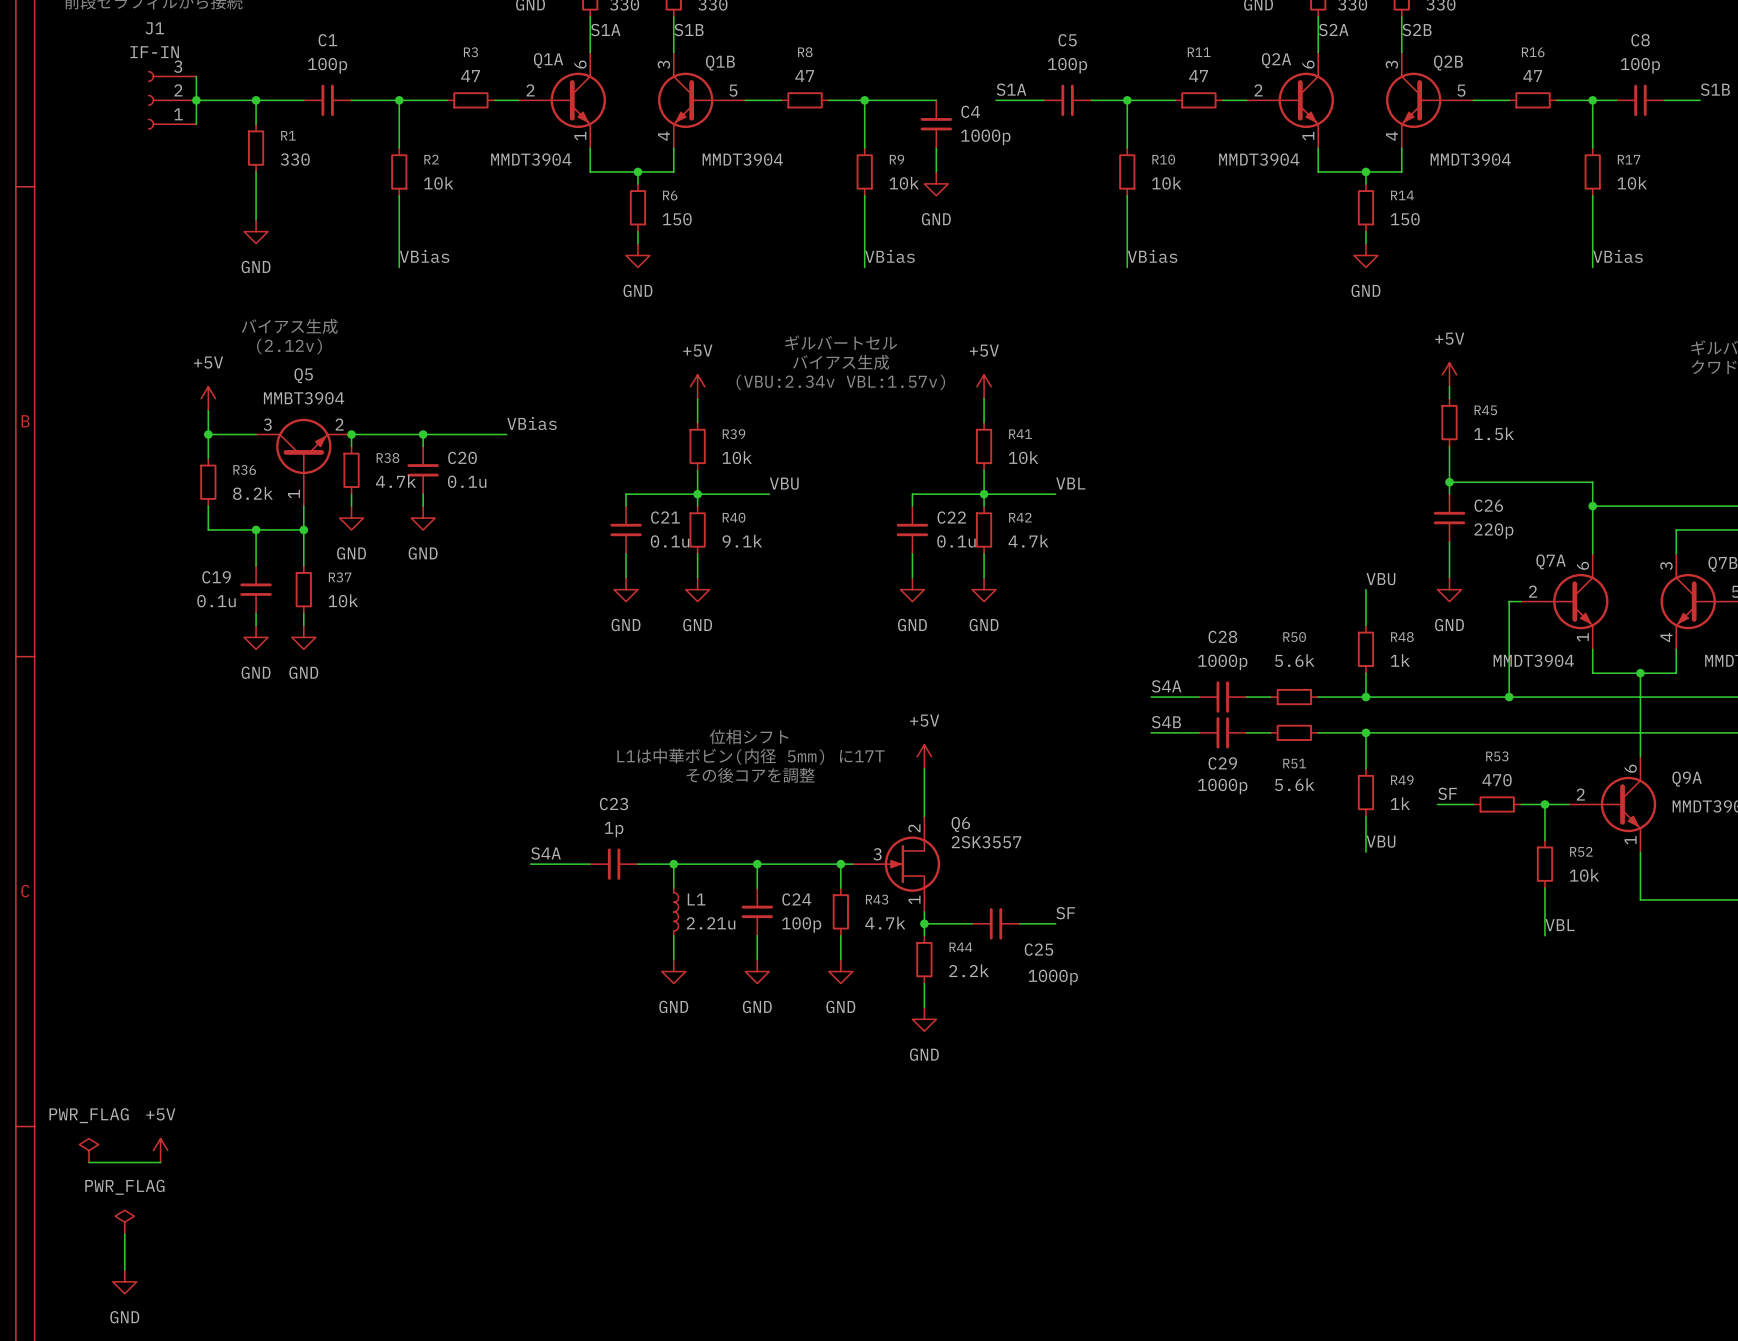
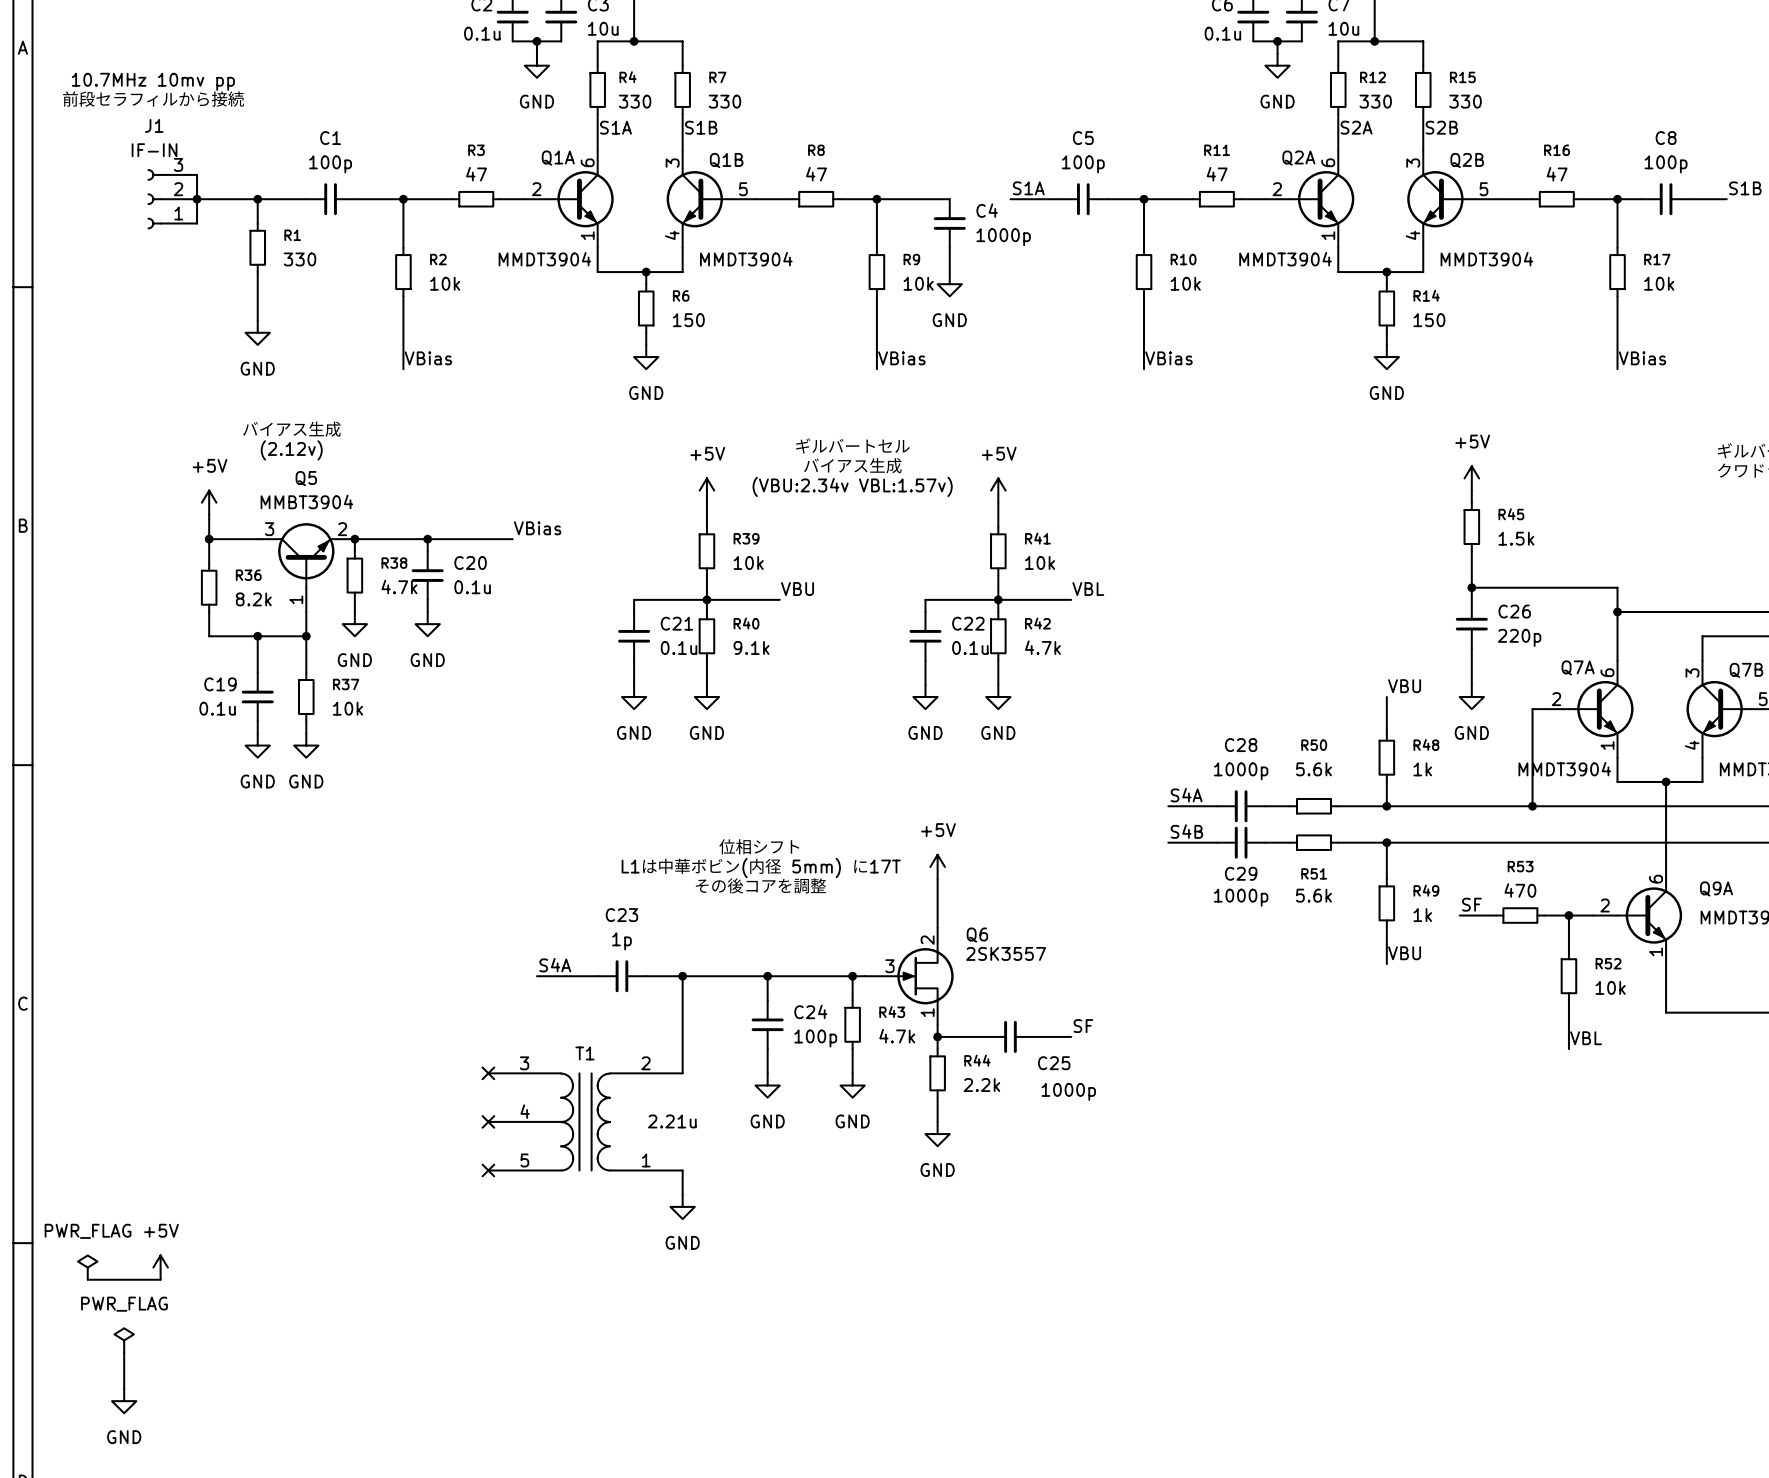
wire: none -> (682, 1000) (682, 1049)
L1: 2.21u (676, 911) -> none
no-connect mark: none -> (488, 1073)
power symbol position: GND (673, 971) -> GND (682, 1206)
no-connect mark: none -> (488, 1121)
T1: none -> 2.21u (585, 1121)
no-connect mark: none -> (488, 1170)
wire: none -> (682, 1170) (682, 1194)

